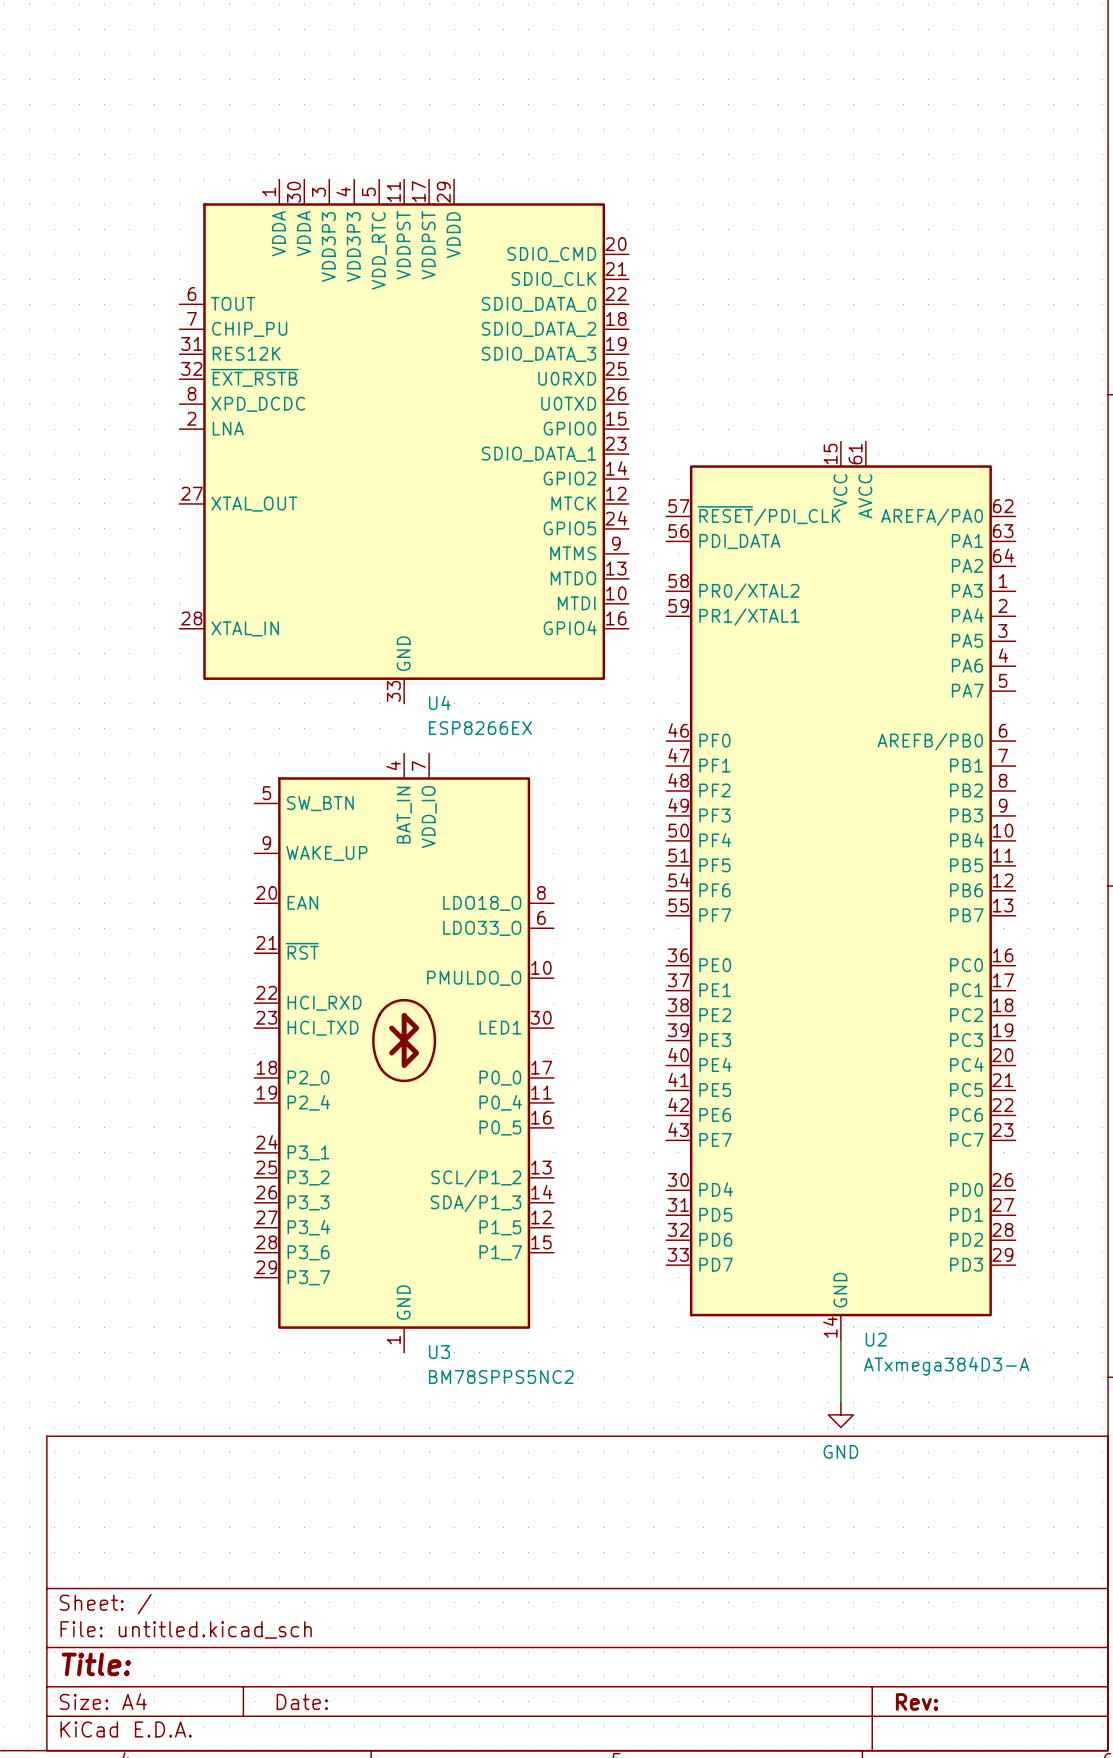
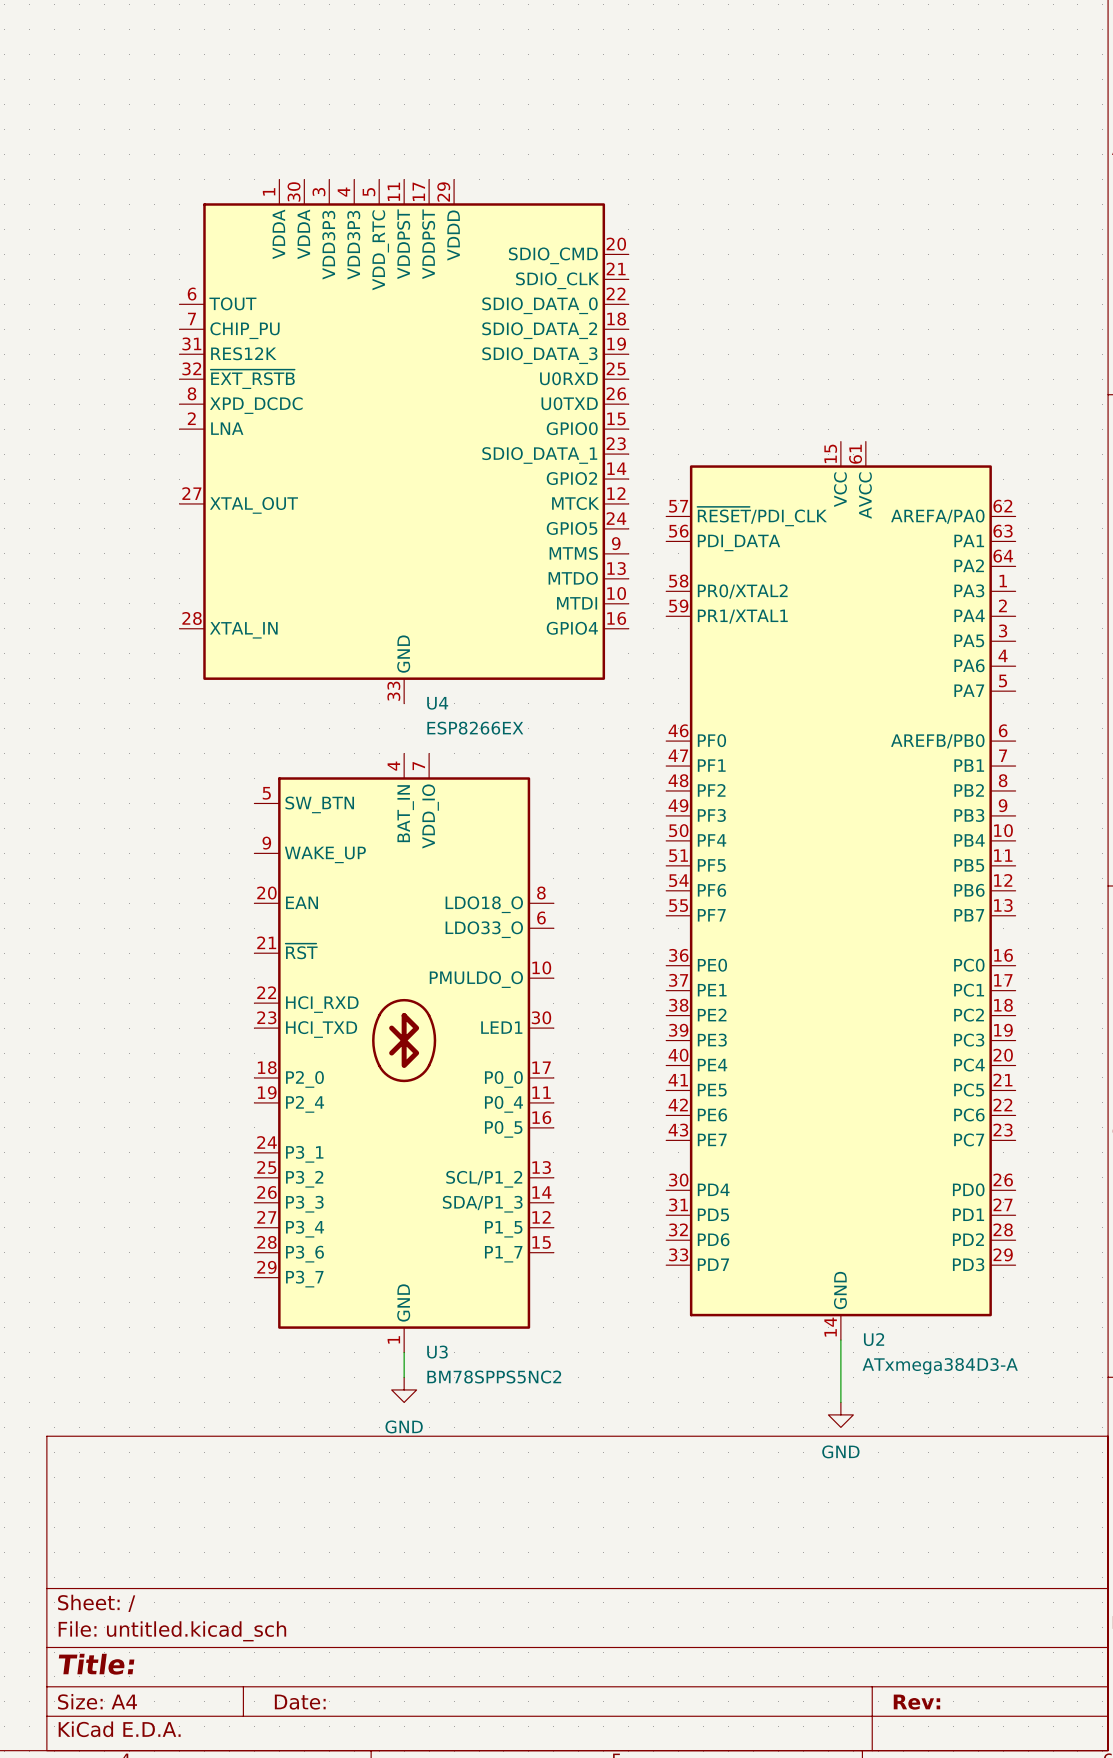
wire: none -> (404, 1352) (404, 1377)
power symbol: none -> GND (404, 1389)

